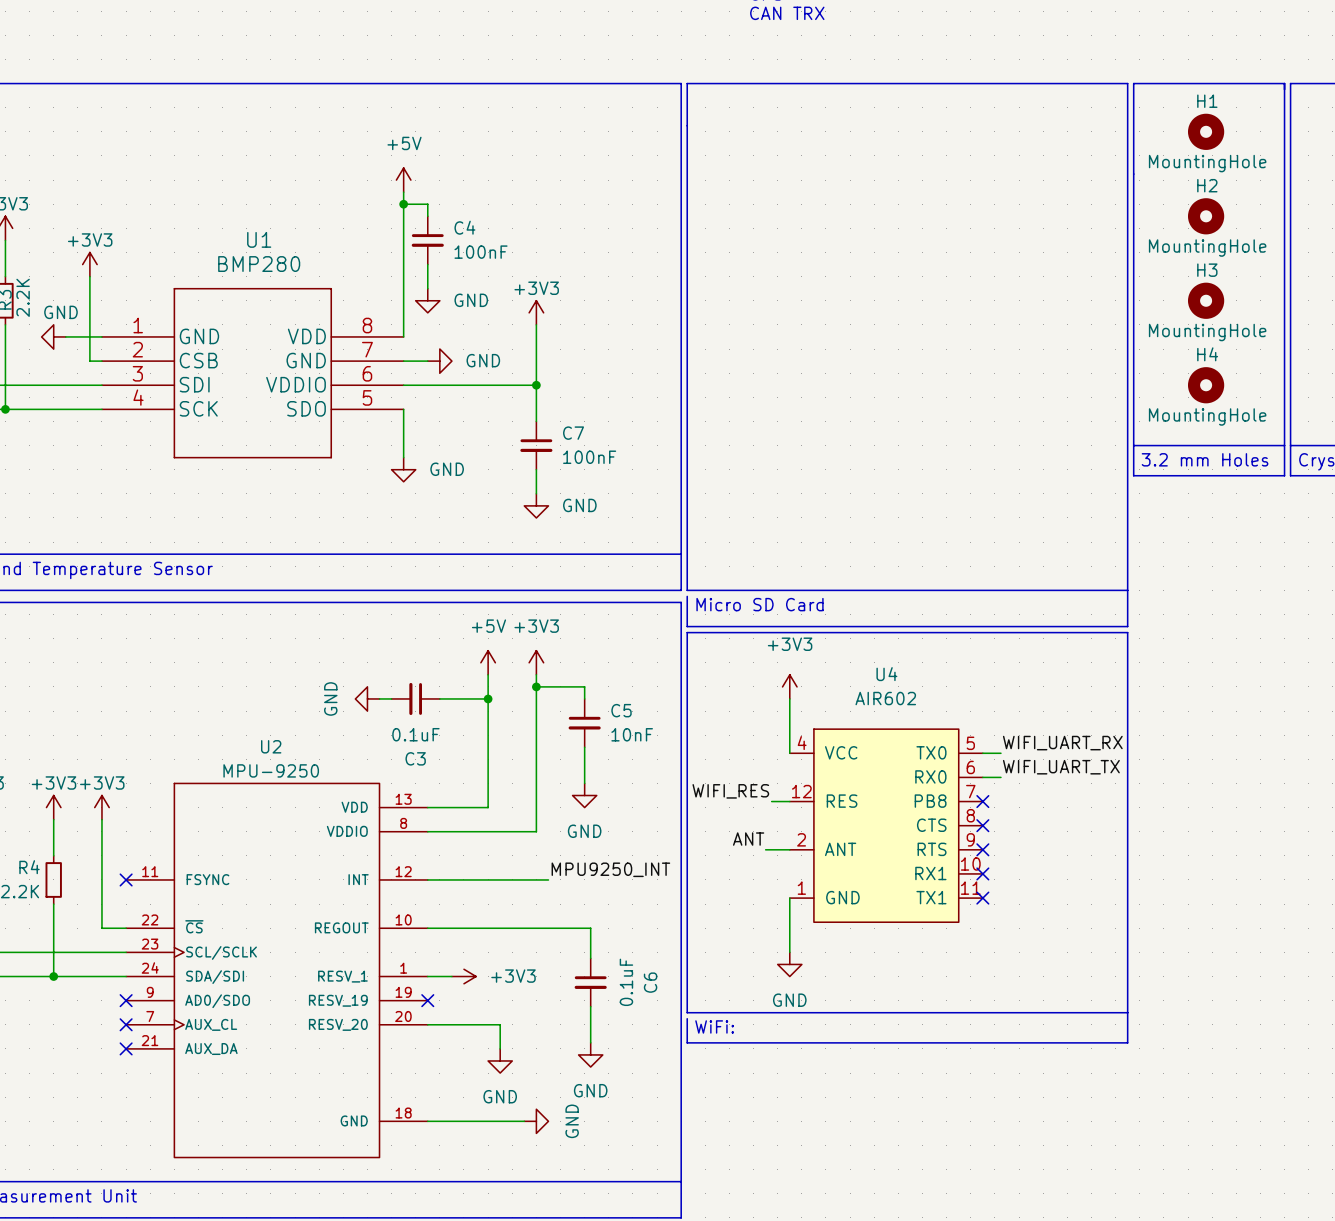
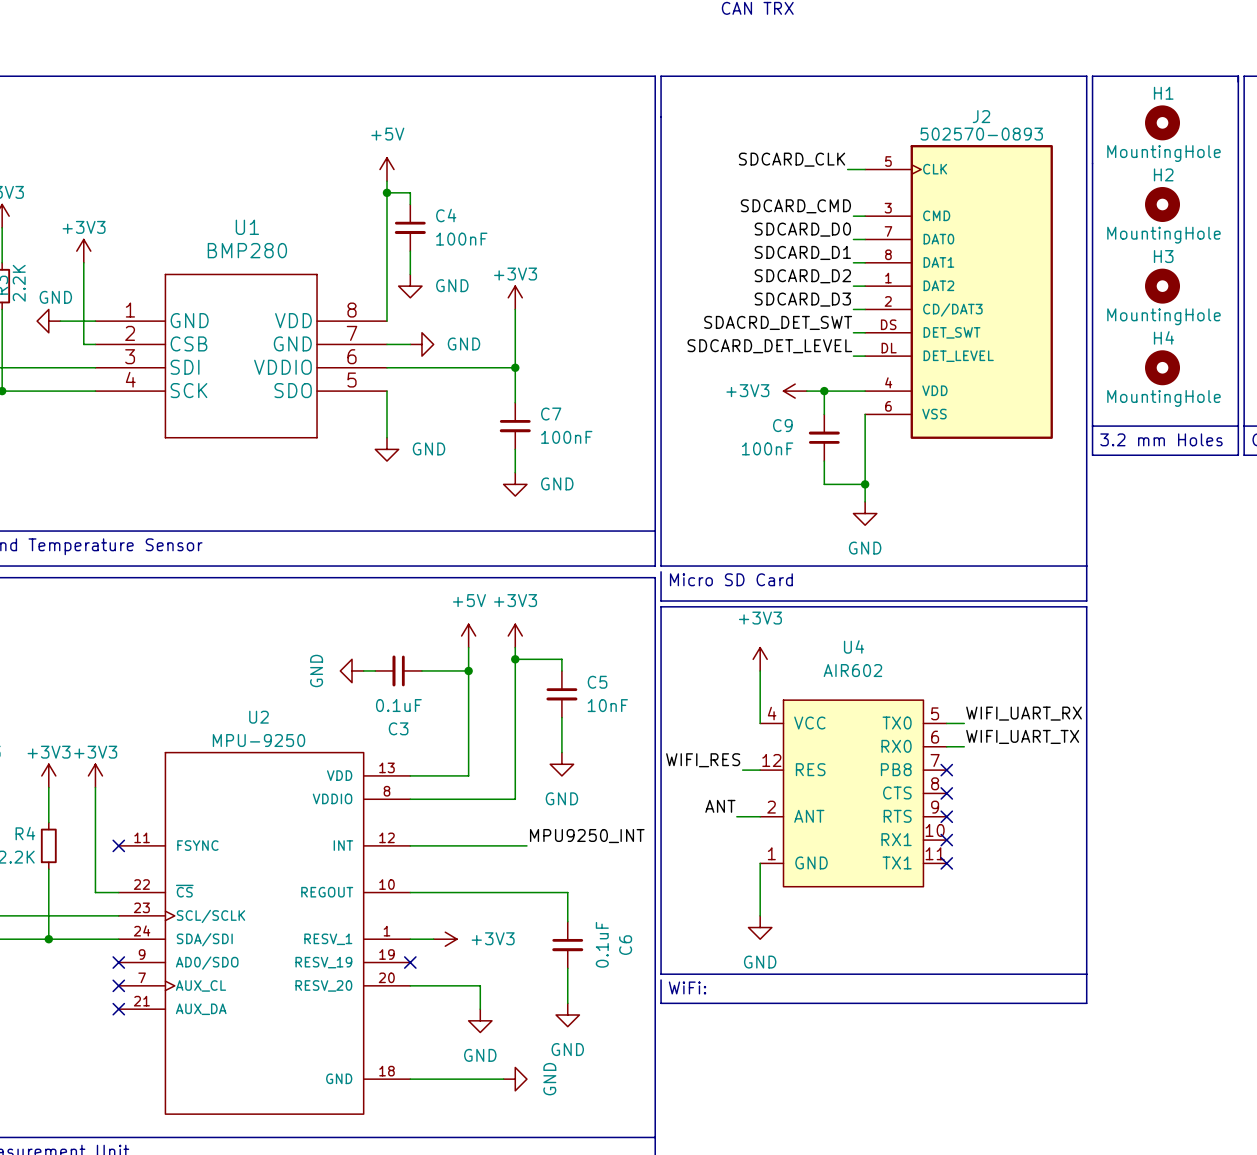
label: none -> SDCARD_CLK (792, 159)
wire: none -> (847, 169) (865, 169)
label: none -> SDCARD_CMD (795, 206)
wire: none -> (853, 216) (865, 216)
label: none -> SDCARD_D0 (802, 229)
wire: none -> (853, 239) (865, 239)
label: none -> SDCARD_D1 (802, 252)
wire: none -> (853, 262) (865, 262)
label: none -> SDCARD_D2 (802, 276)
wire: none -> (853, 286) (865, 286)
J2: none -> 502570-0893 (959, 291)
label: none -> SDCARD_D3 (802, 299)
wire: none -> (853, 309) (865, 309)
label: none -> SDACRD_DET_SWT (778, 322)
wire: none -> (853, 332) (865, 332)
label: none -> SDCARD_DET_LEVEL (769, 346)
wire: none -> (853, 356) (865, 356)
power symbol: none -> +3V3 (795, 391)
wire: none -> (806, 391) (865, 391)
wire: none -> (824, 391) (824, 414)
junction: none -> (824, 391)
wire: none -> (865, 414) (865, 501)
C9: none -> 100nF (824, 437)
wire: none -> (824, 461) (824, 484) (865, 484)
junction: none -> (865, 484)
power symbol: none -> GND (865, 513)

